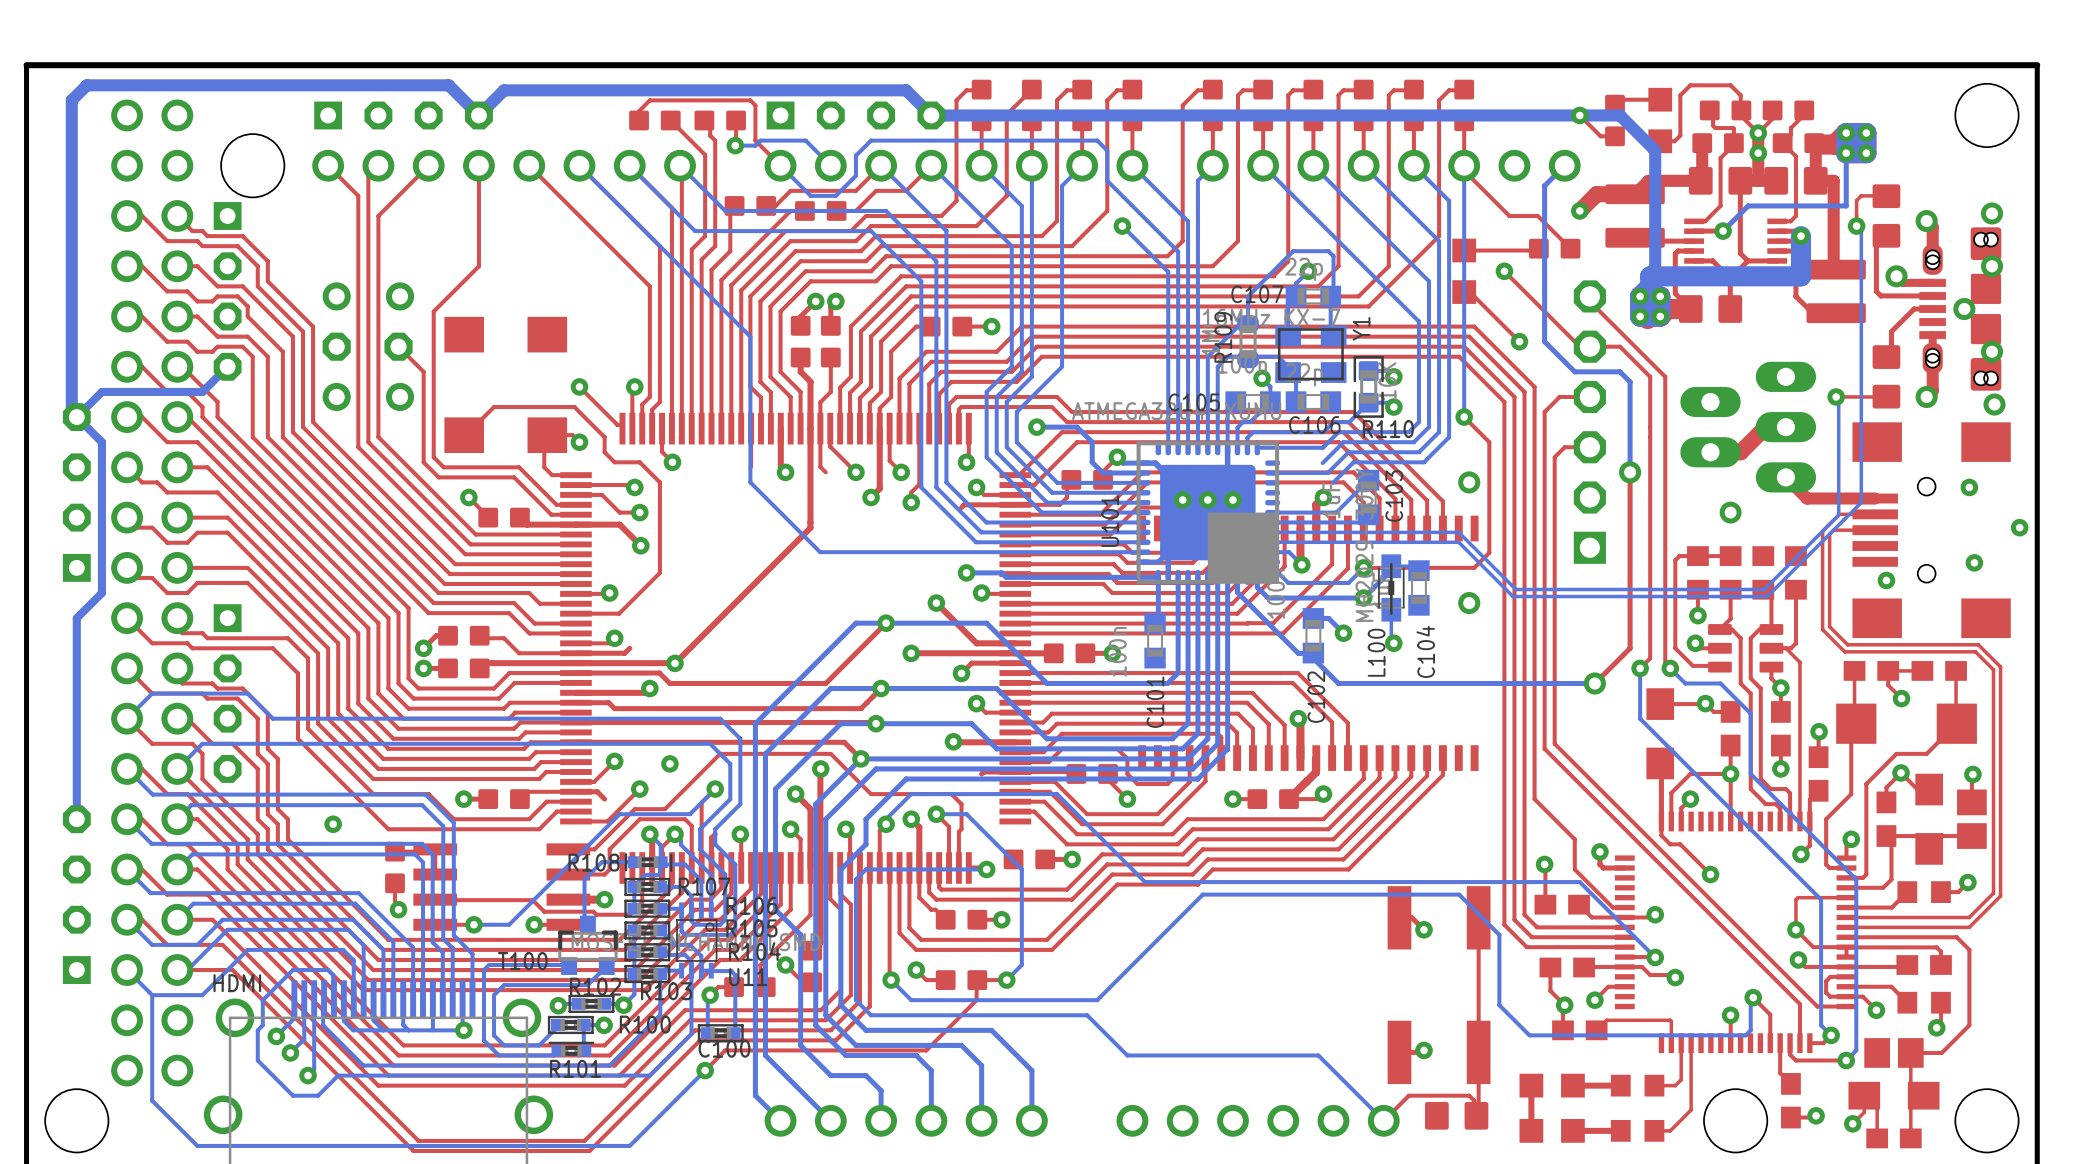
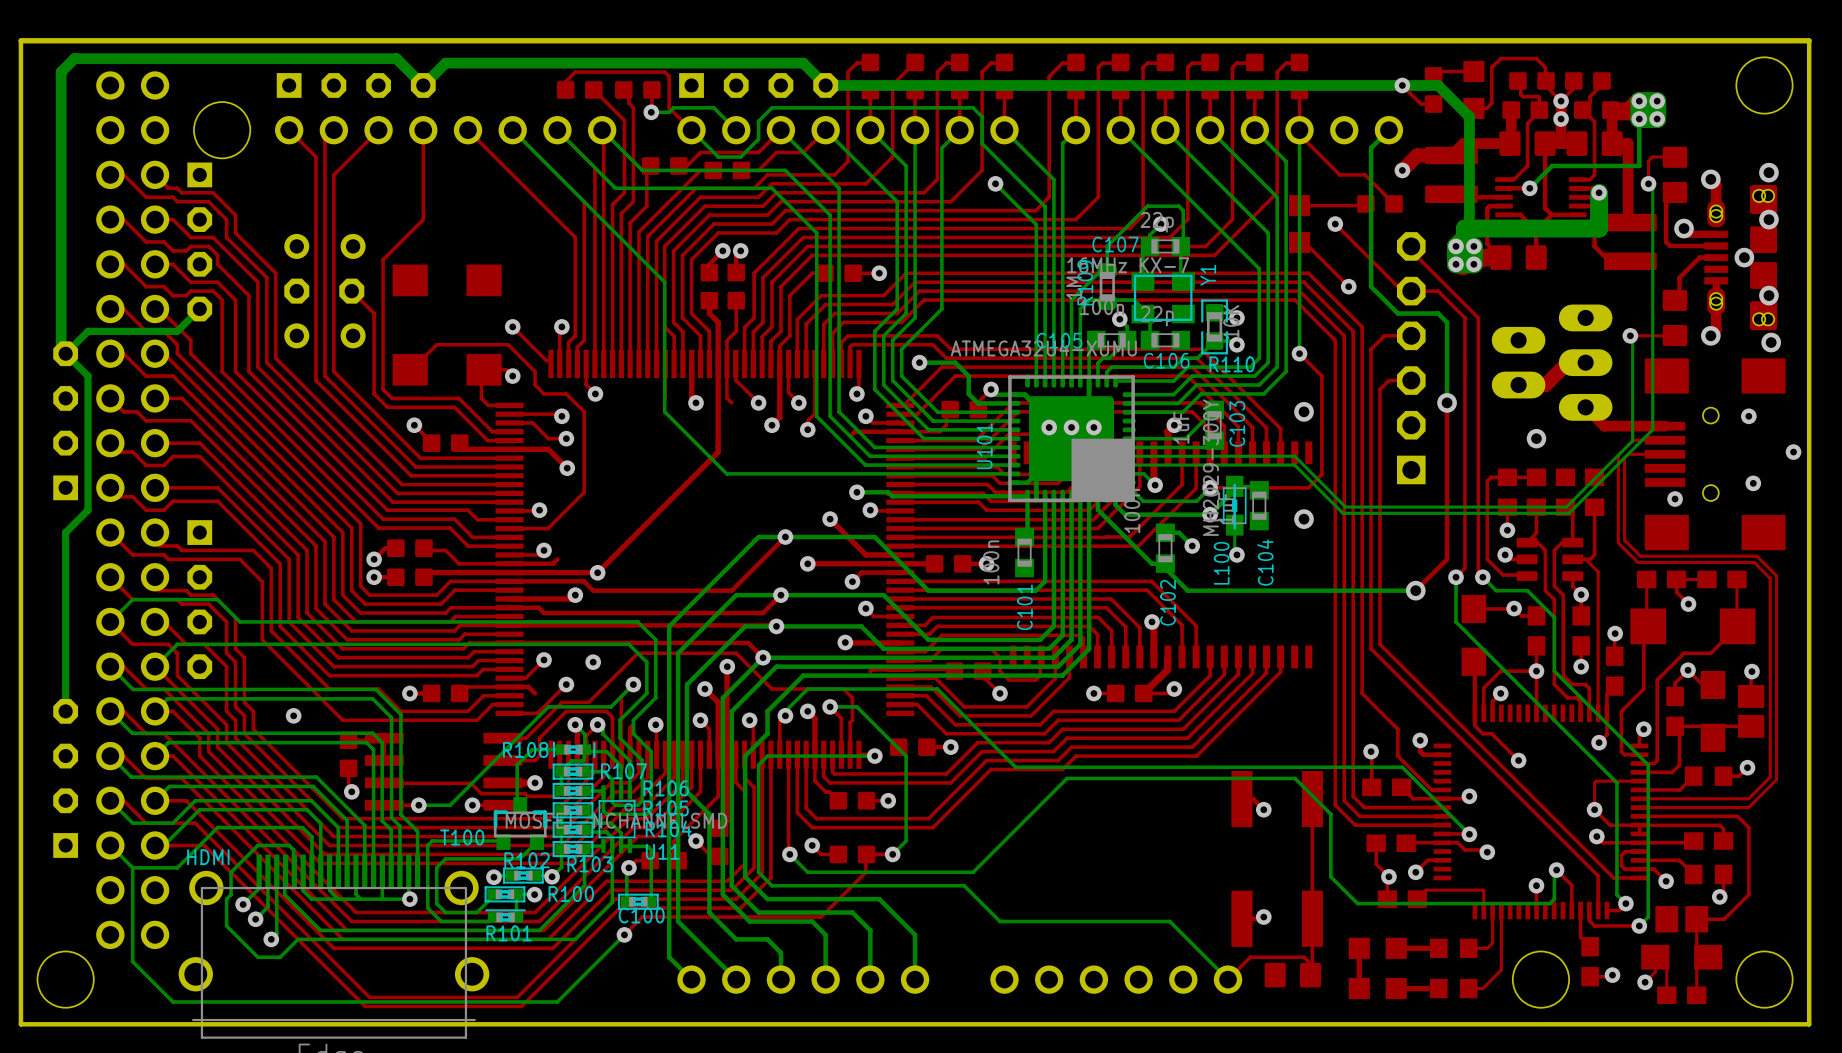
bottom track: none -> (1173, 394) (1129, 394)
bottom track: none -> (1182, 412) (1129, 412)

